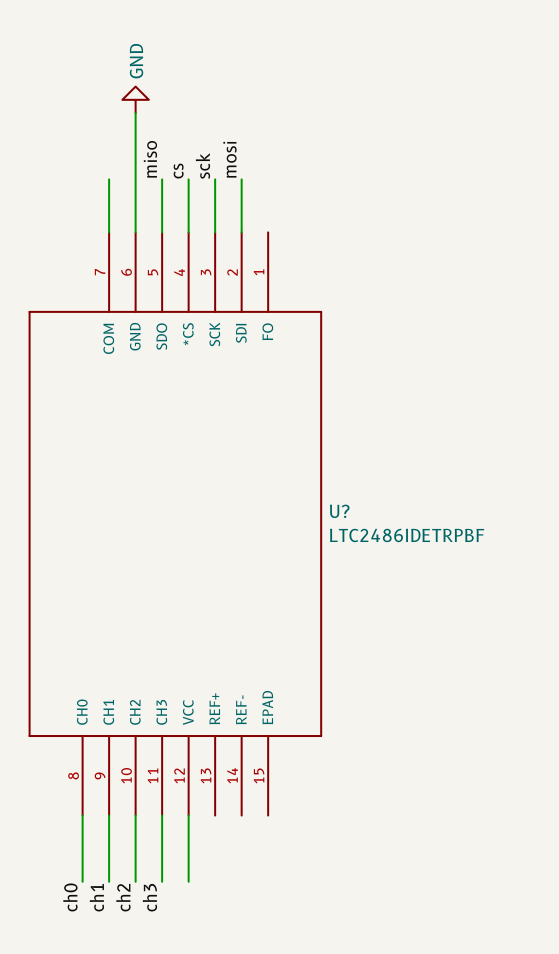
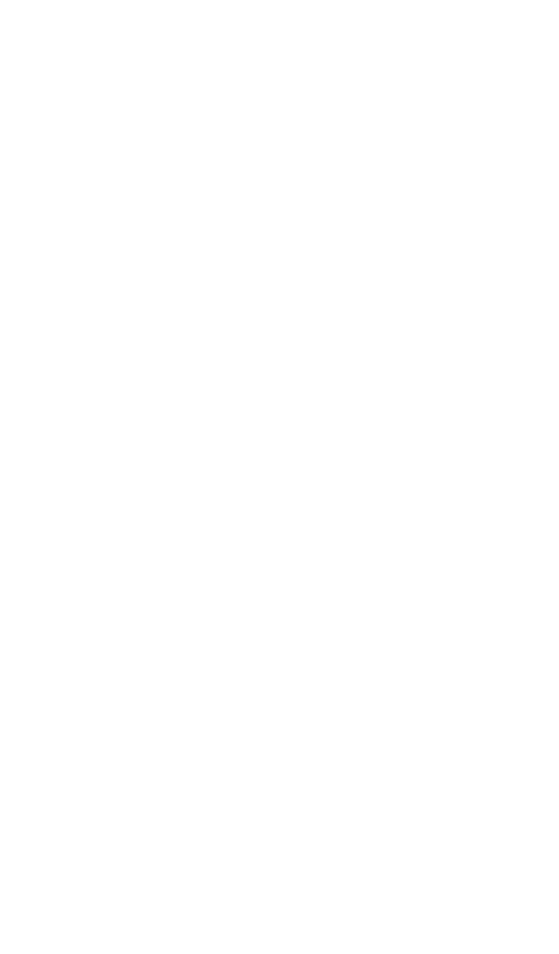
power symbol: GND (135, 99) -> none
wire: (135, 113) (135, 232) -> none
label: miso (150, 159) -> none
label: mosi (229, 159) -> none
label: sck (202, 166) -> none
label: cs (178, 171) -> none
wire: (109, 179) (109, 232) -> none
wire: (162, 179) (162, 232) -> none
wire: (188, 179) (188, 232) -> none
wire: (215, 179) (215, 232) -> none
wire: (241, 179) (241, 232) -> none
U?: LTC2486IDETRPBF (175, 523) -> none
wire: (82, 815) (82, 881) -> none
wire: (109, 815) (109, 881) -> none
wire: (135, 815) (135, 881) -> none
wire: (162, 815) (162, 881) -> none
wire: (188, 815) (188, 881) -> none
label: ch0 (70, 897) -> none
label: ch1 (96, 897) -> none
label: ch2 (123, 897) -> none
label: ch3 (149, 897) -> none

